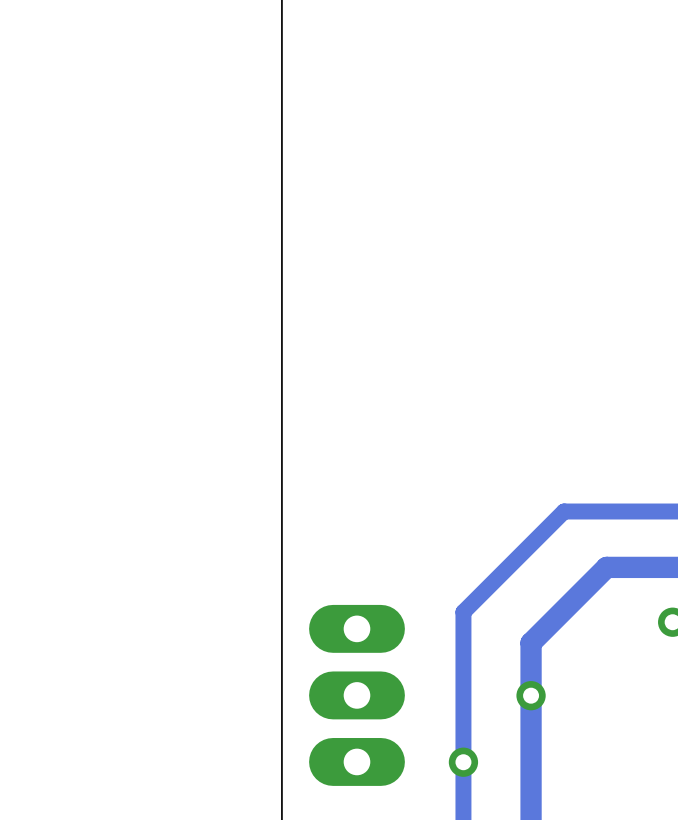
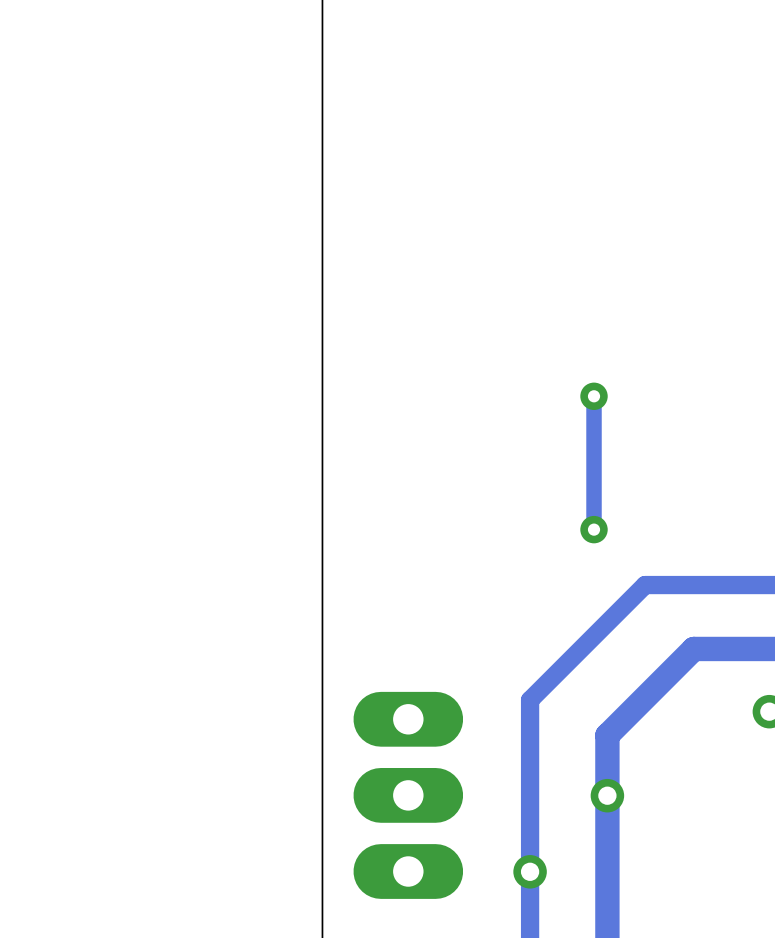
track: none -> (594, 396) (594, 529)
via: none -> (594, 396)
via: none -> (594, 529)

